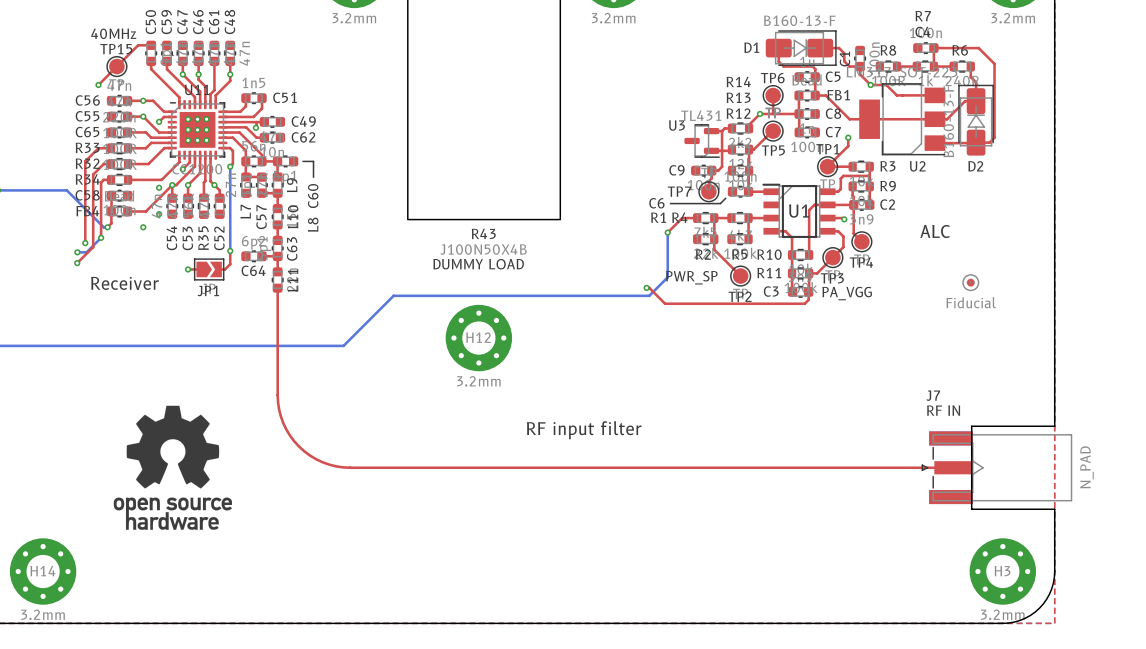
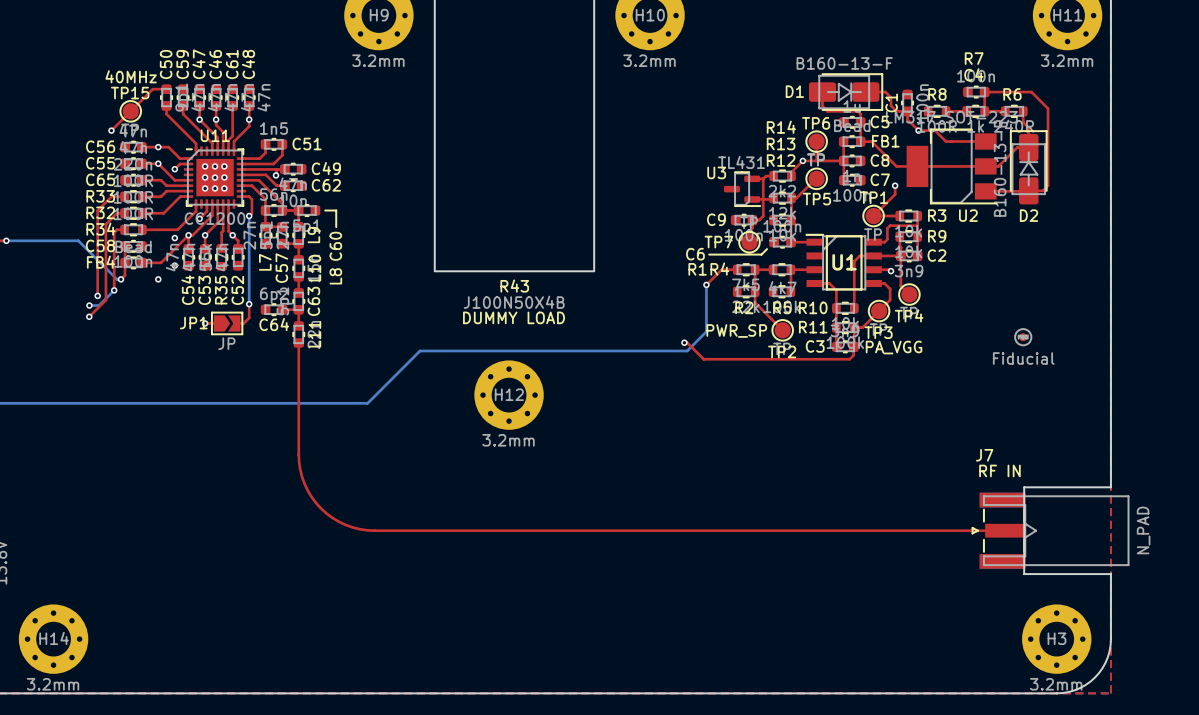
text: ALC (935, 231) -> none
text: Receiver (125, 283) -> none
JP1 name position: JP1 (208, 291) -> JP1 (193, 323)
drawing: [113, 405, 233, 530] -> none
text: RF input filter (584, 430) -> none

